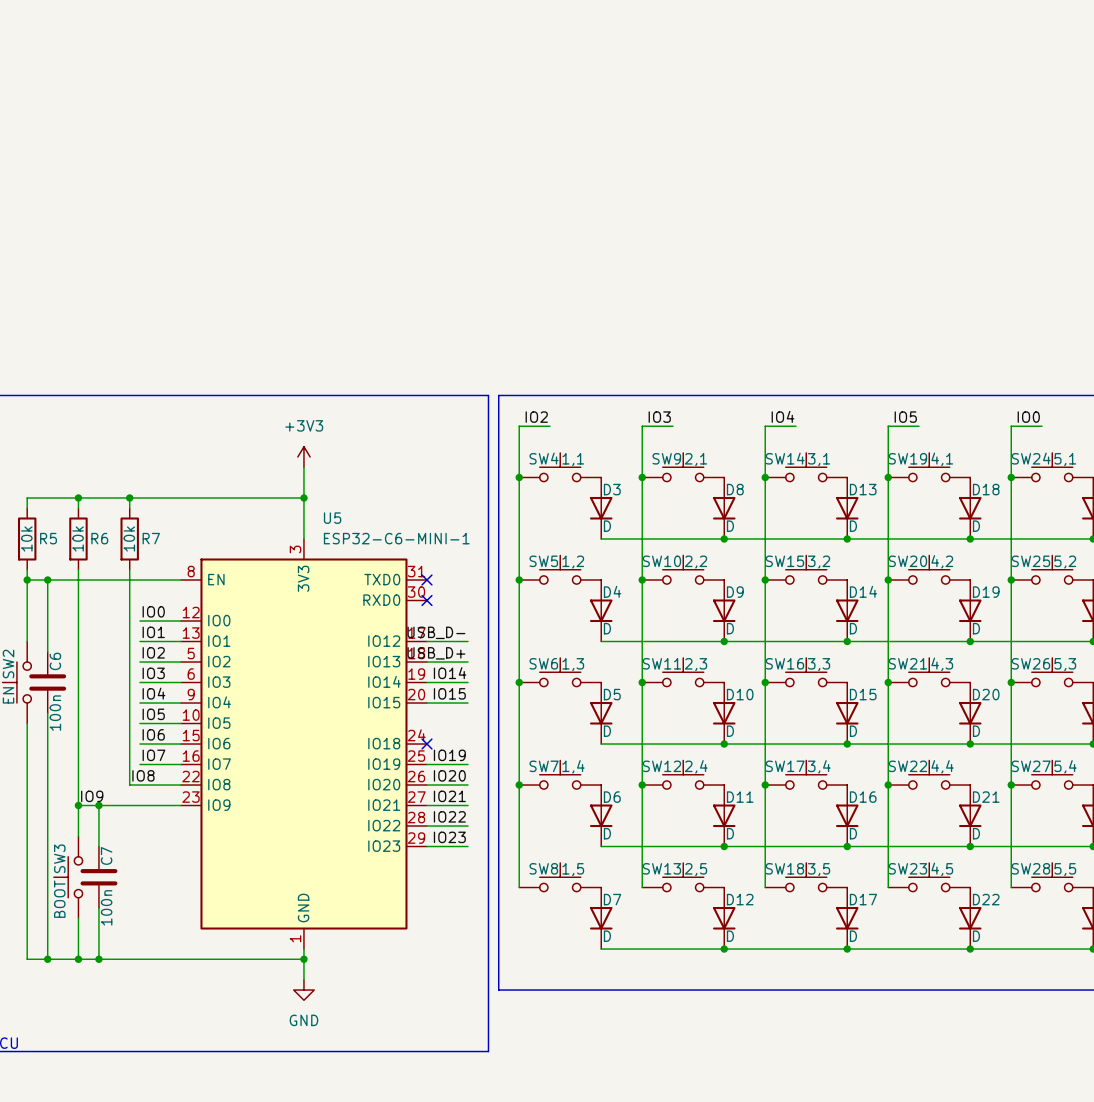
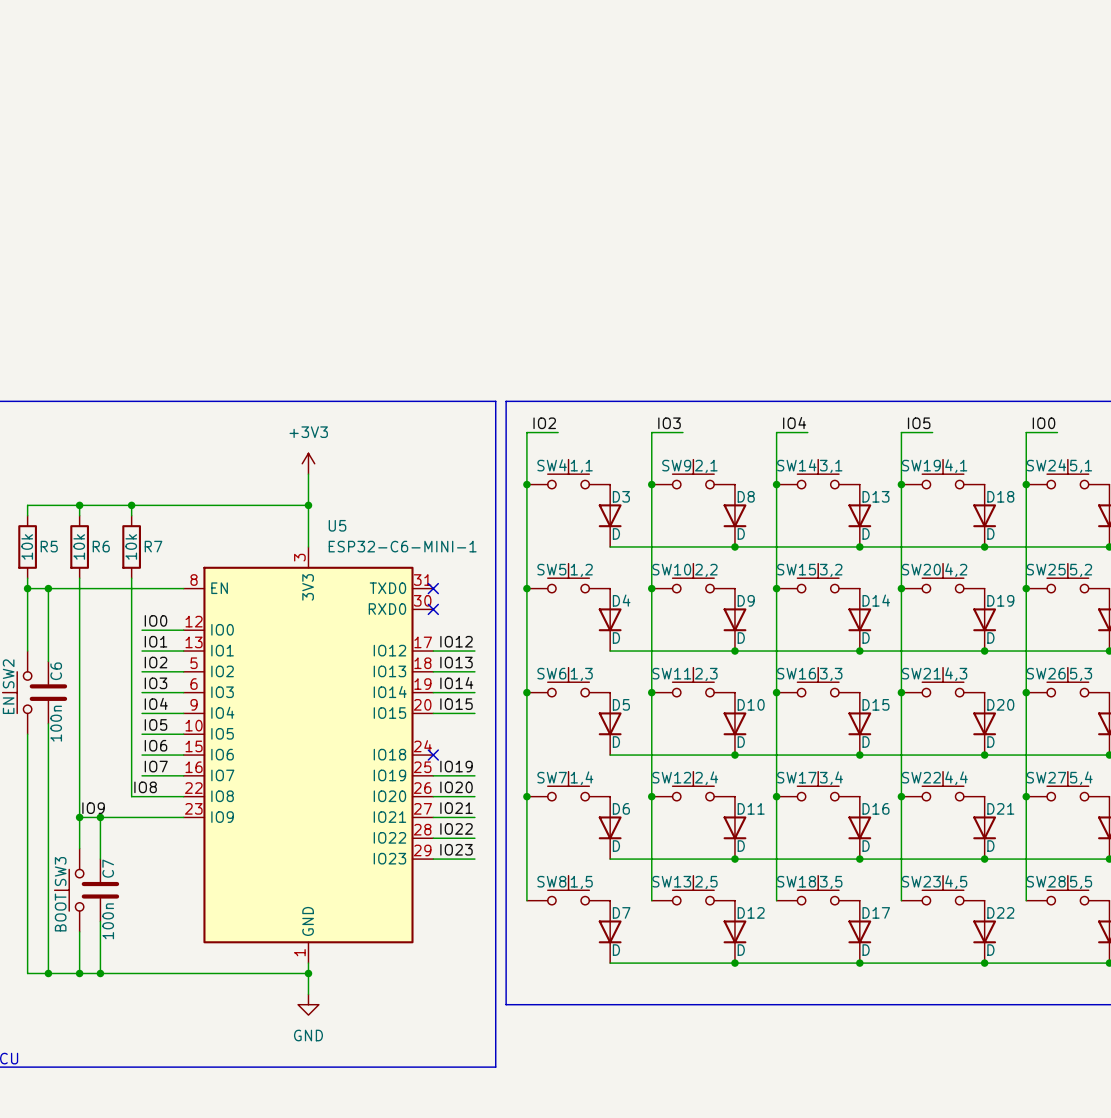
label: USB_D- (436, 632) -> IO12 (456, 641)
label: USB_D+ (436, 653) -> IO13 (456, 662)

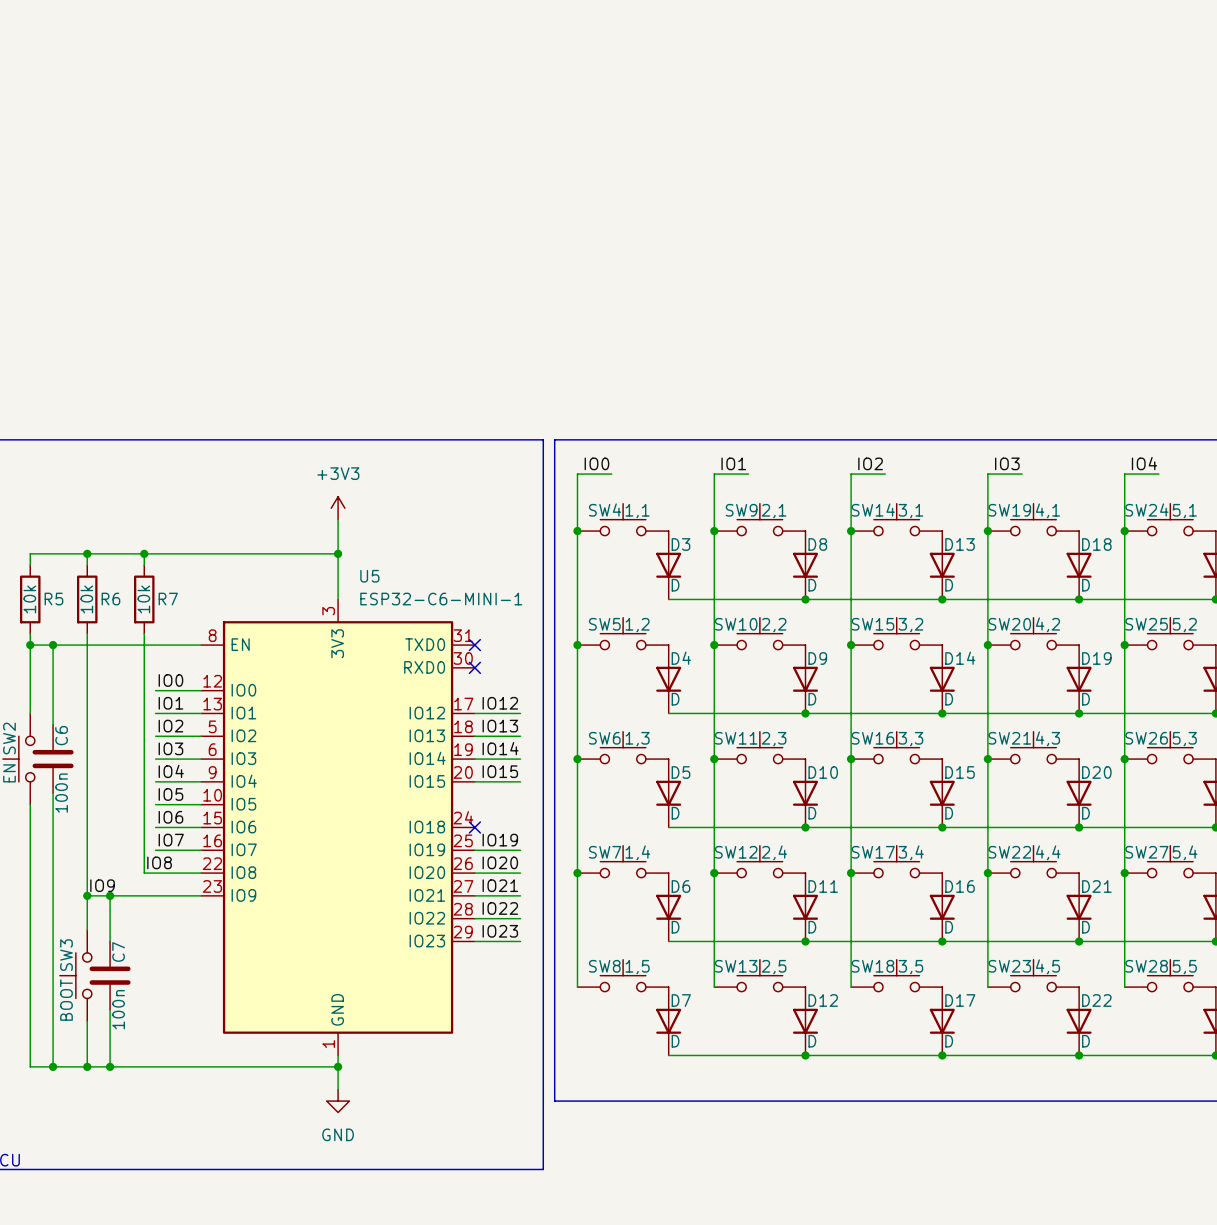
label: IO2 (544, 423) -> IO0 (596, 463)
label: IO3 (669, 423) -> IO1 (733, 463)
label: IO4 (794, 423) -> IO2 (870, 463)
label: IO5 (919, 423) -> IO3 (1007, 463)
label: IO0 (1044, 423) -> IO4 (1144, 463)

